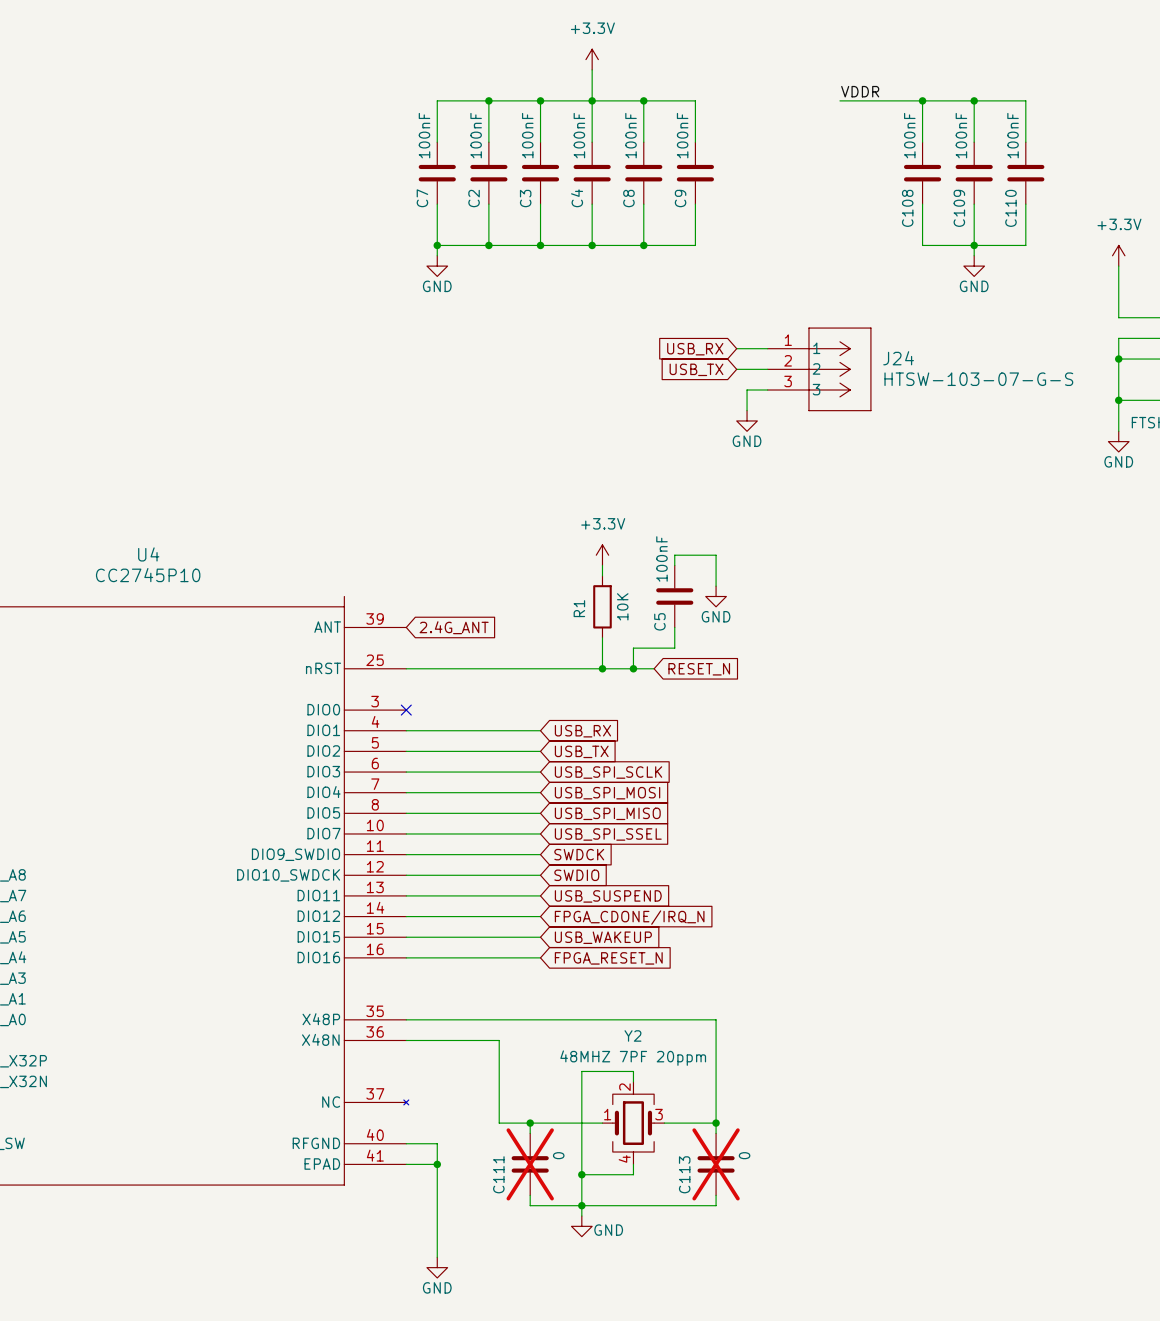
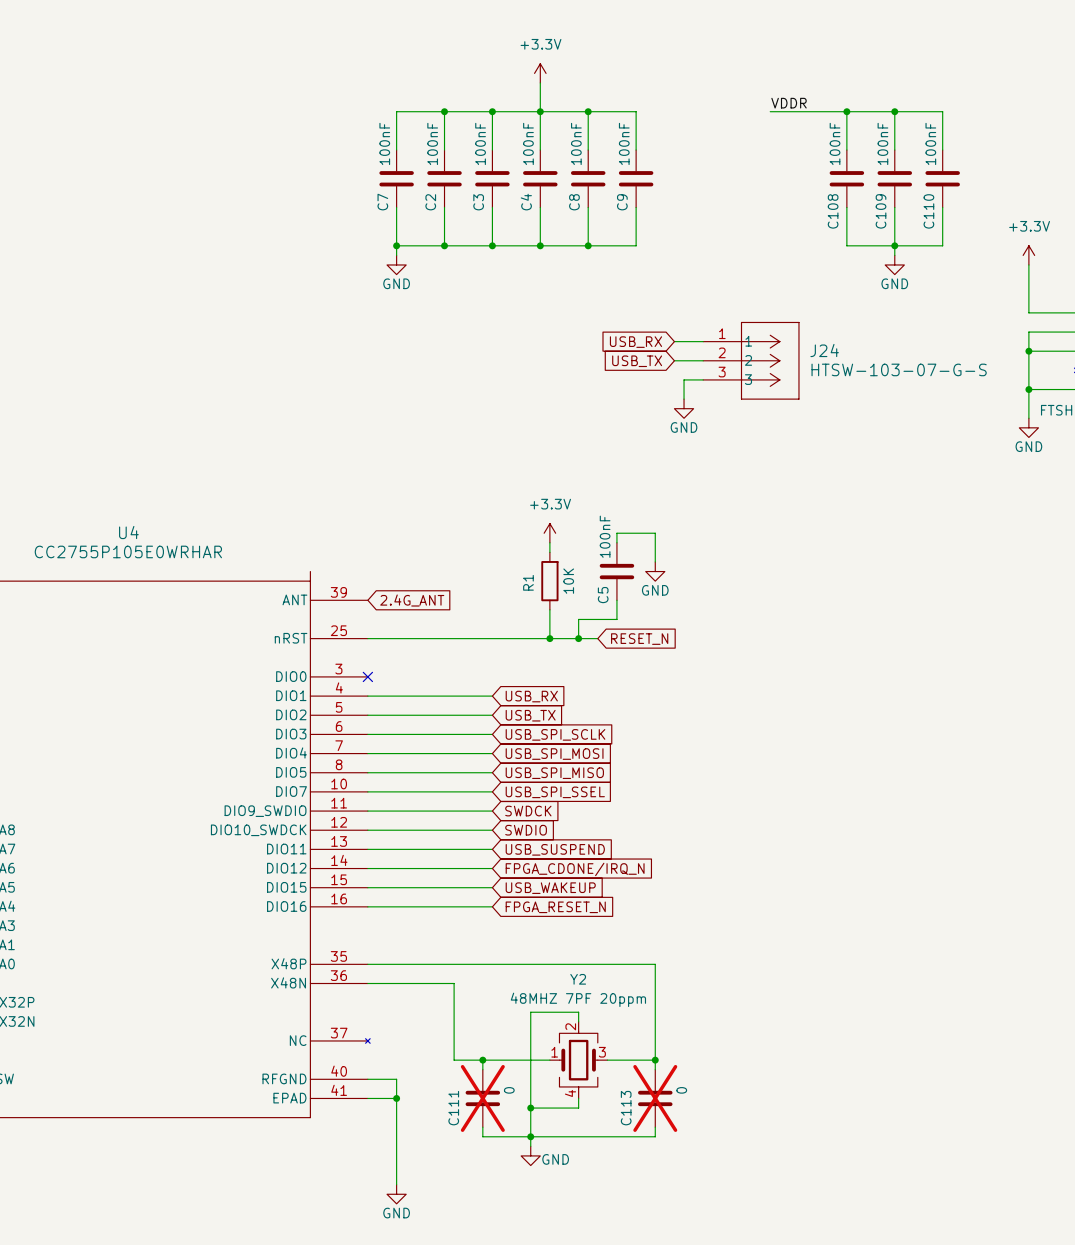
U4 value: CC2745P10 (148, 575) -> CC2755P105E0WRHAR (128, 551)

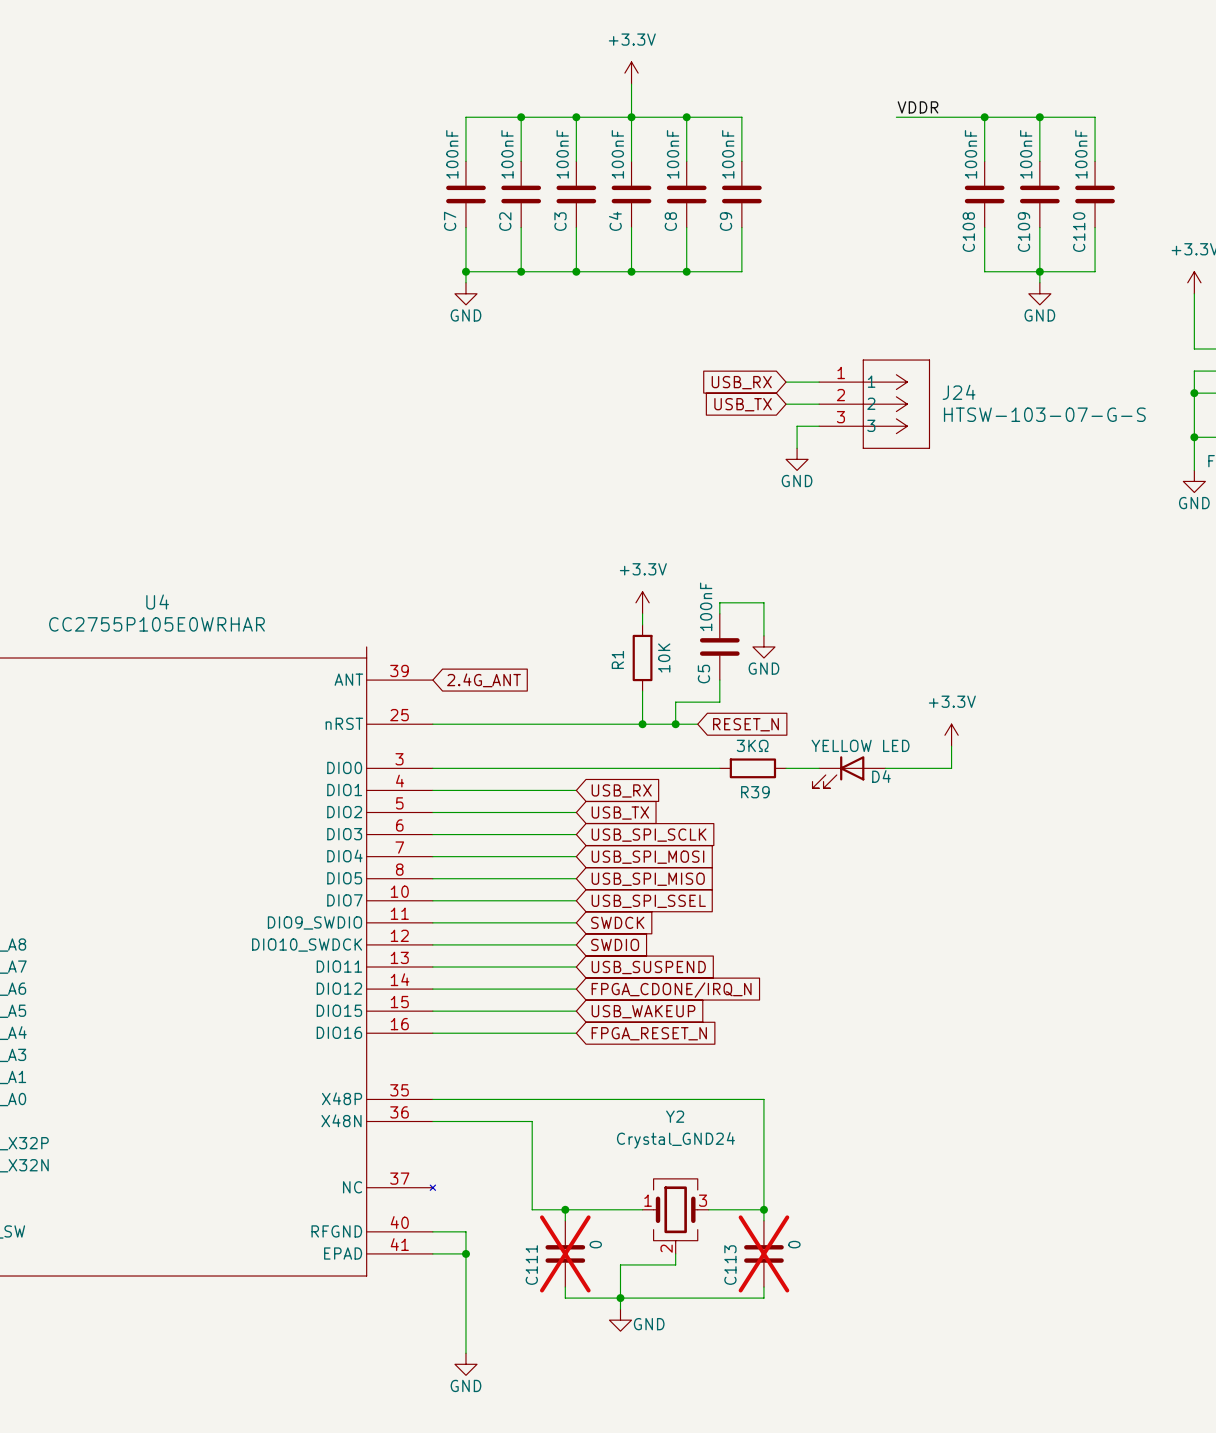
power symbol: none -> +3.3V (951, 735)
wire: none -> (951, 746) (951, 768) (885, 768)
wire: none -> (432, 768) (719, 768)
no-connect mark: (367, 676) -> none
R39: none -> 3KΩ (752, 768)
wire: none -> (786, 768) (819, 768)
D4: none -> YELLOW LED (848, 772)
Y2 value: 48MHZ 7PF 20ppm (578, 999) -> Crystal_GND24 (675, 1140)
Y2 symbol: [549, 1021, 608, 1099] -> [642, 1178, 709, 1254]
wire: (578, 1021) (578, 1012) (530, 1012) (530, 1108) -> none
junction: (530, 1108) -> none

